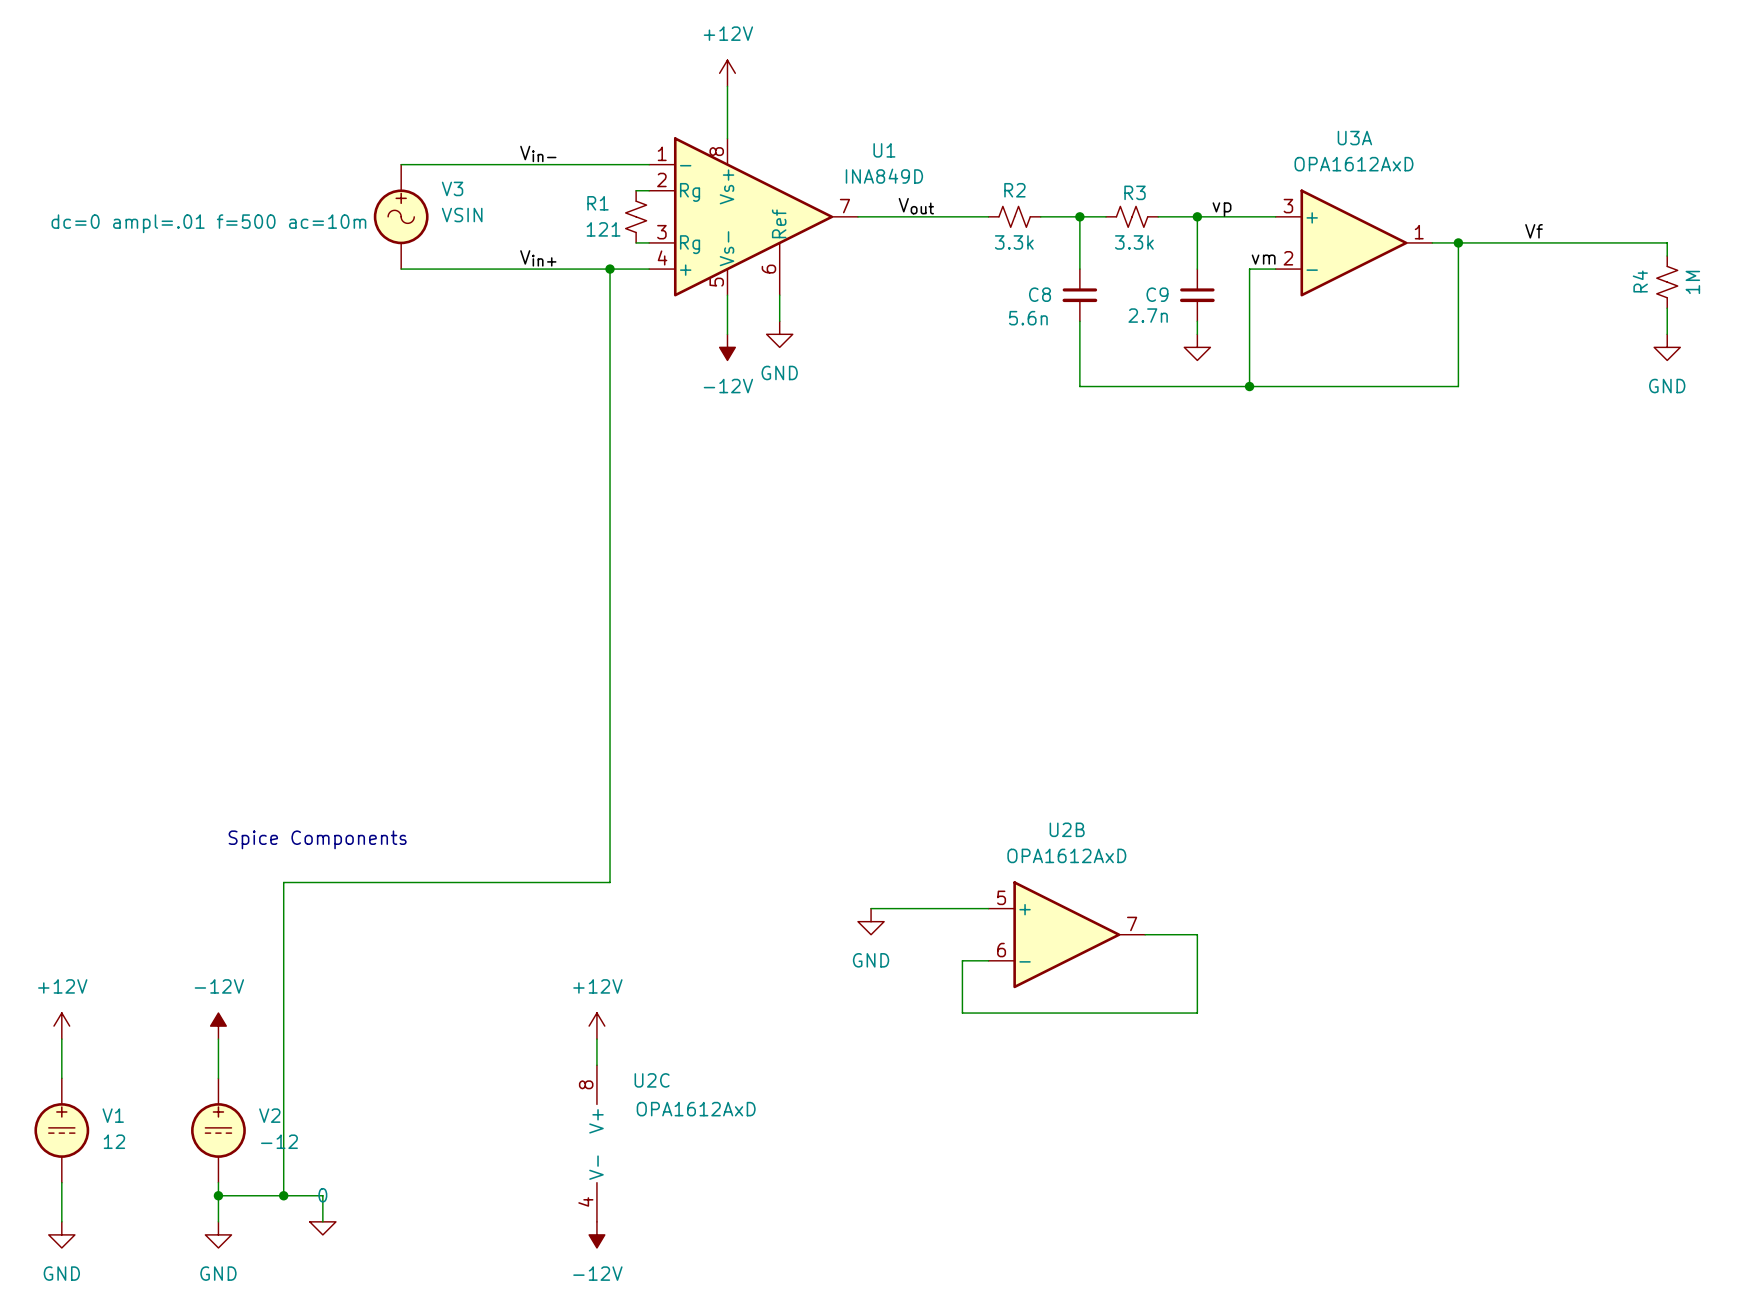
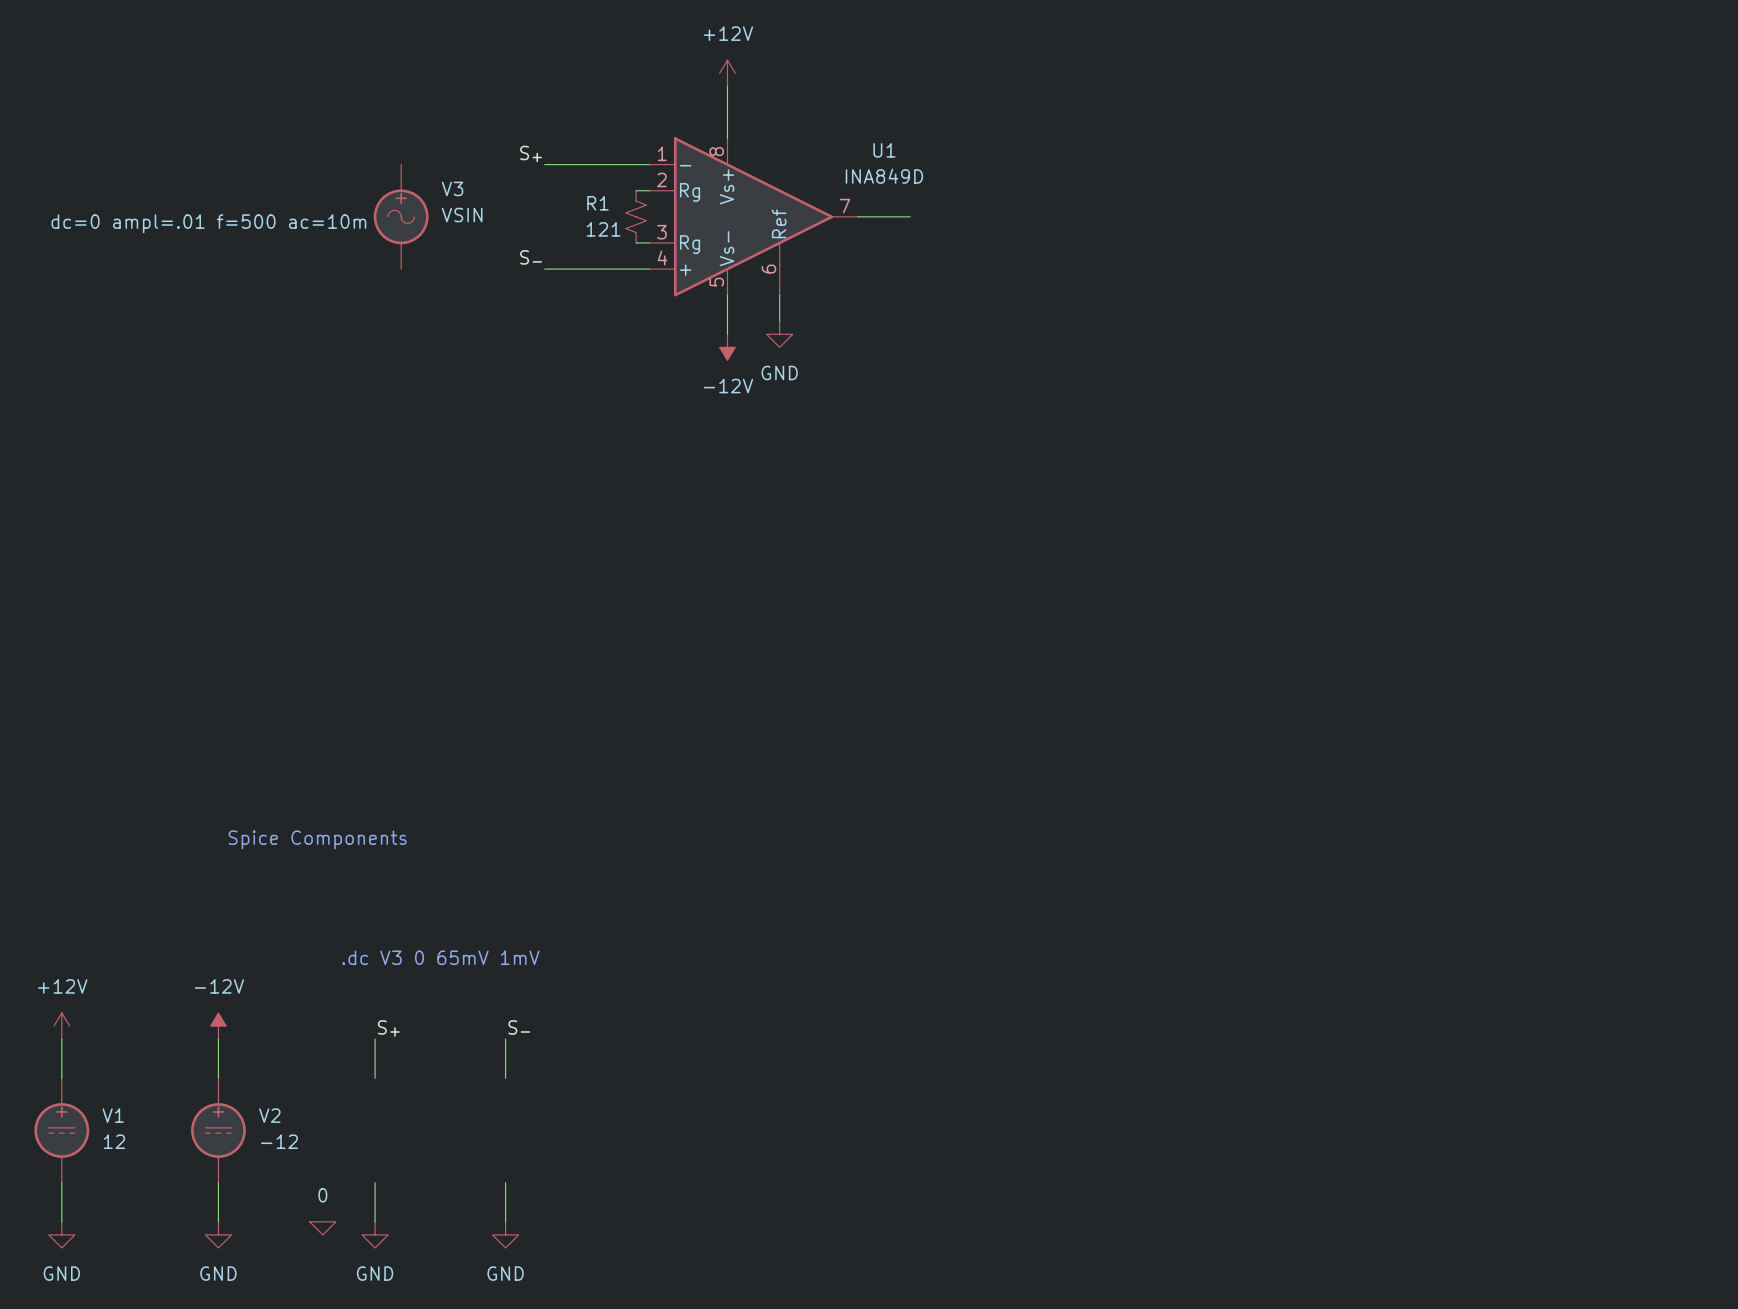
label: none -> S+ (531, 153)
label: Vin- (538, 153) -> none
wire: (401, 164) (544, 164) -> none
label: Vout (916, 206) -> none
label: vp (1222, 209) -> none
wire: (910, 216) (988, 216) -> none
R2: 3.3k (1014, 216) -> none
wire: (1040, 216) (1105, 216) -> none
wire: (1079, 216) (1079, 269) -> none
junction: (1079, 216) -> none
R3: 3.3k (1132, 216) -> none
wire: (1158, 216) (1275, 216) -> none
wire: (1197, 216) (1197, 269) -> none
junction: (1197, 216) -> none
label: Vf (1534, 231) -> none
U3A: OPA1612AxD (1353, 242) -> none
wire: (1432, 242) (1667, 242) (1667, 256) -> none
wire: (1458, 242) (1458, 386) (1079, 386) (1079, 321) -> none
junction: (1458, 242) -> none
label: none -> S- (531, 257)
label: Vin+ (538, 258) -> none
label: vm (1263, 259) -> none
wire: (401, 269) (544, 269) -> none
wire: (610, 269) (610, 882) (283, 882) (283, 1195) -> none
junction: (610, 269) -> none
wire: (1275, 269) (1249, 269) (1249, 386) -> none
R4: 1M (1667, 282) -> none
C8: 5.6n (1079, 295) -> none
C9: 2.7n (1197, 295) -> none
wire: (1667, 308) (1667, 334) -> none
wire: (1197, 321) (1197, 334) -> none
power symbol: (1197, 347) -> none
power symbol: GND (1667, 347) -> none
junction: (1249, 386) -> none
wire: (871, 908) (988, 908) -> none
power symbol: GND (871, 921) -> none
U2B: OPA1612AxD (1066, 934) -> none
wire: (1145, 934) (1197, 934) (1197, 1013) (962, 1013) (962, 960) (988, 960) -> none
text: none -> .dc V3 0 65mV 1mV (440, 957)
power symbol: +12V (596, 1026) -> none
label: none -> S- (519, 1027)
label: none -> S+ (388, 1028)
wire: none -> (375, 1039) (375, 1078)
wire: none -> (505, 1039) (505, 1078)
wire: (596, 1039) (596, 1065) -> none
U2C: OPA1612AxD (596, 1143) -> none
wire: none -> (375, 1182) (375, 1221)
wire: none -> (505, 1182) (505, 1221)
wire: (218, 1195) (322, 1195) (322, 1221) -> none
junction: (218, 1195) -> none
junction: (283, 1195) -> none
power symbol: none -> GND (375, 1234)
power symbol: none -> GND (505, 1234)
power symbol: -12V (596, 1234) -> none

